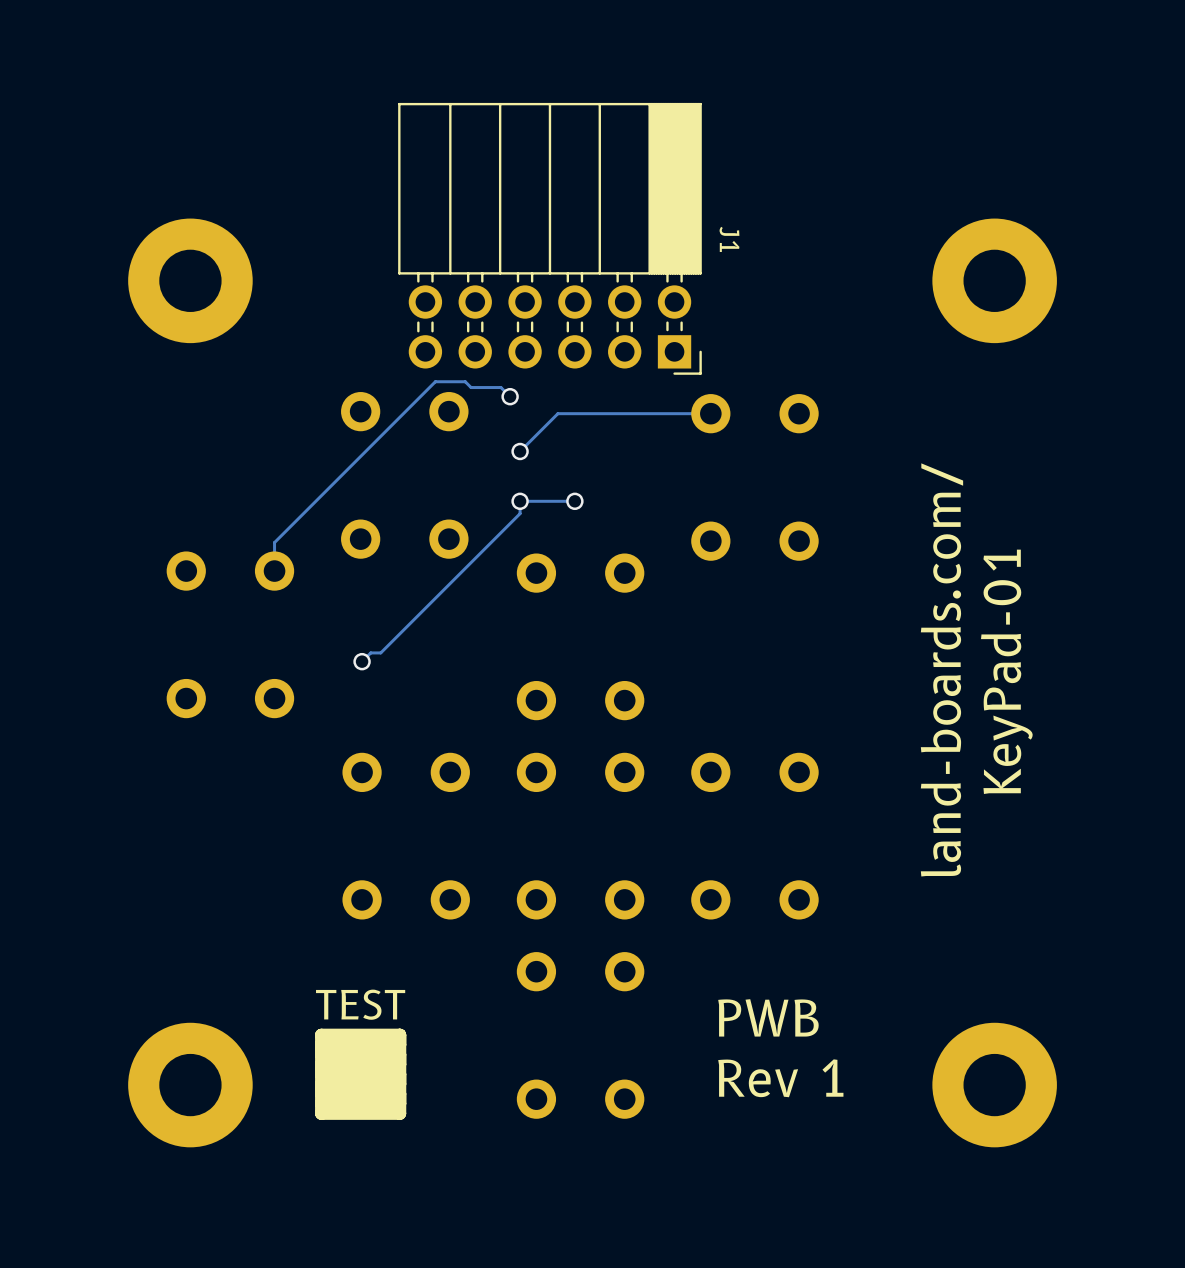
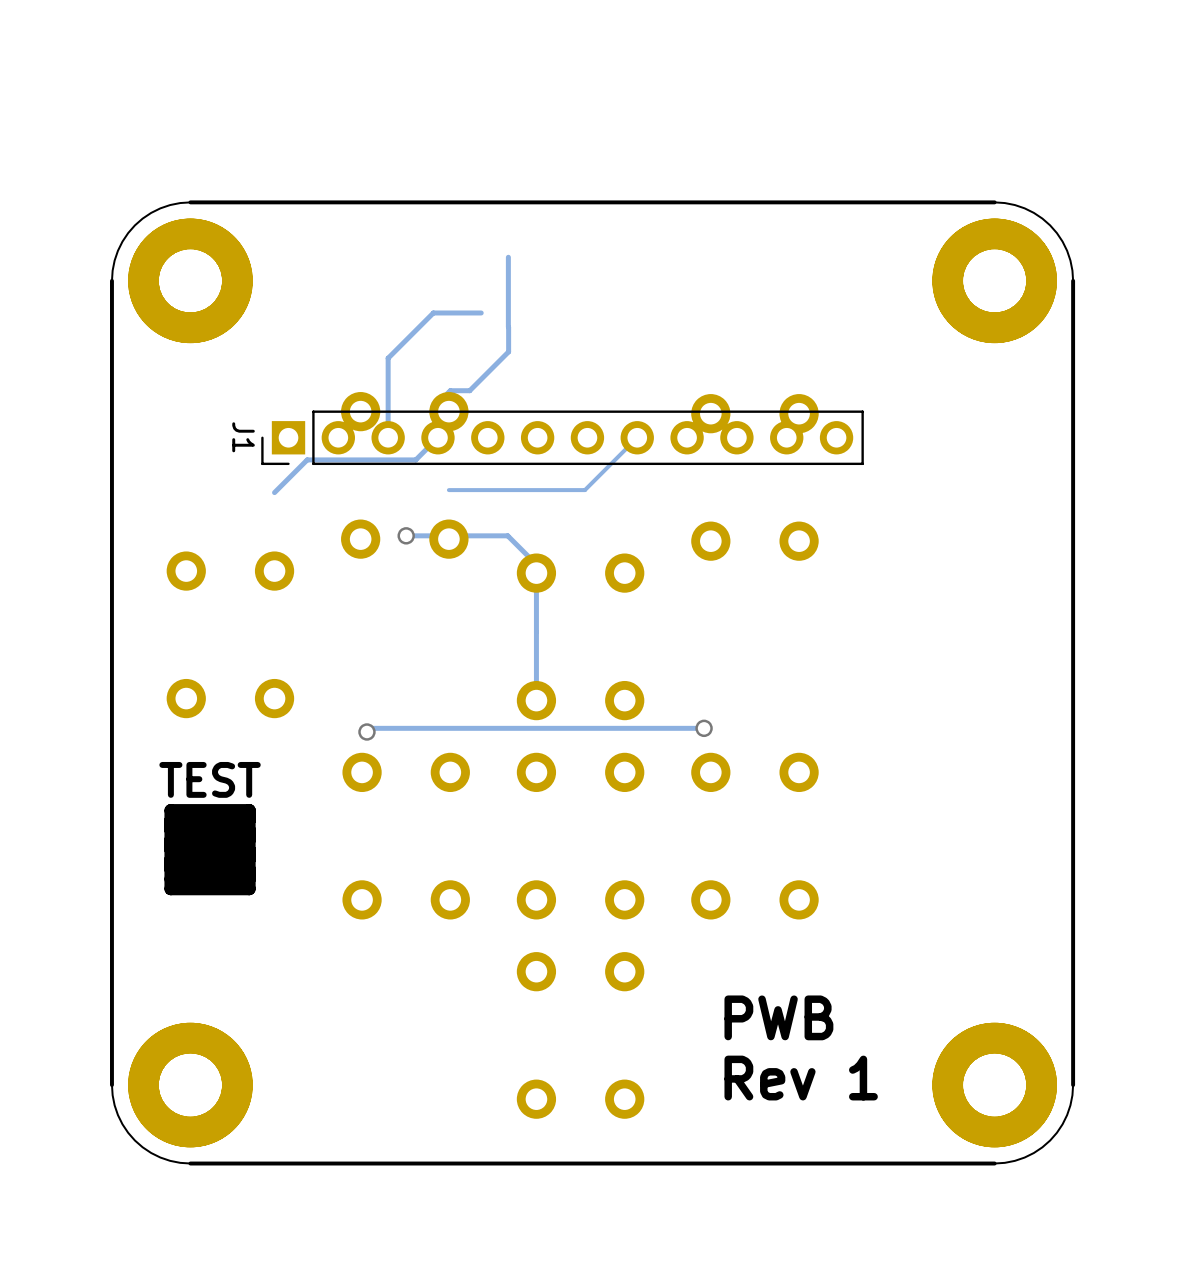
J1 footprint: [398, 102, 702, 375] -> [261, 410, 864, 466]
board edge: none -> (994, 202) (190, 202) (160, 208) (134, 225) (117, 250) (111, 280) (111, 1085) (117, 1115) (134, 1140) (160, 1157) (190, 1163) (994, 1163) (1024, 1157) (1050, 1140) (1067, 1115) (1073, 1085) (1073, 280) (1067, 250) (1050, 225) (1024, 208) (994, 202)
J1 name position: J1 (729, 239) -> J1 (243, 437)
track: none -> (508, 257) (508, 327)
part: none -> (190, 280)
part: none -> (994, 280)
track: none -> (481, 312) (433, 312) (388, 358) (388, 437)
track: none -> (508, 327) (508, 351) (469, 390) (450, 390) (437, 403) (437, 437) (415, 459) (307, 459) (274, 492)
track: (510, 396) (500, 387) (471, 387) (465, 381) (435, 381) (274, 542) (274, 571) -> none
via: (510, 396) -> none
track: (710, 413) (557, 413) (520, 451) -> none
track: none -> (637, 437) (584, 490) (448, 490)
via: (520, 451) -> none
via: (520, 501) -> none
track: (574, 501) (520, 501) (520, 513) (380, 652) (370, 652) (362, 661) -> none
via: (574, 501) -> none
track: none -> (406, 535) (507, 535) (536, 564) (536, 705) (543, 712)
via: none -> (406, 535)
via: (362, 661) -> none
text: land-boards.com/ (941, 669) -> none
text: KeyPad-01 (1006, 671) -> none
track: none -> (704, 728) (370, 728) (366, 731)
via: none -> (704, 728)
via: none -> (366, 731)
TEST position: (360, 1074) -> (210, 849)
part: none -> (190, 1085)
part: none -> (994, 1085)

